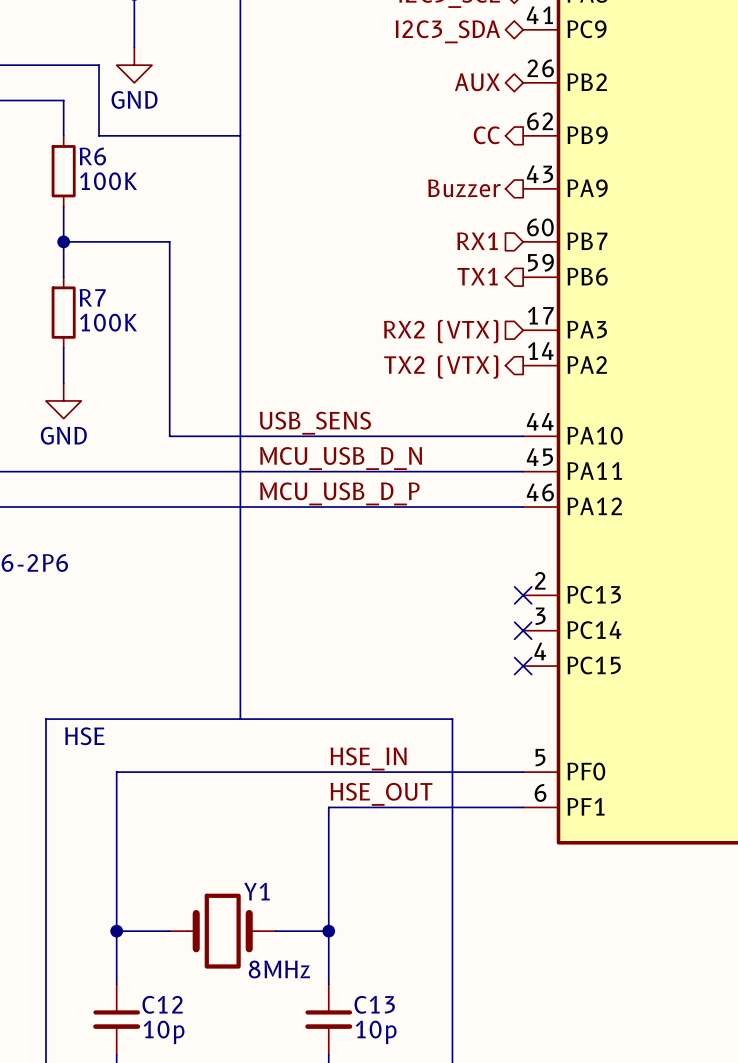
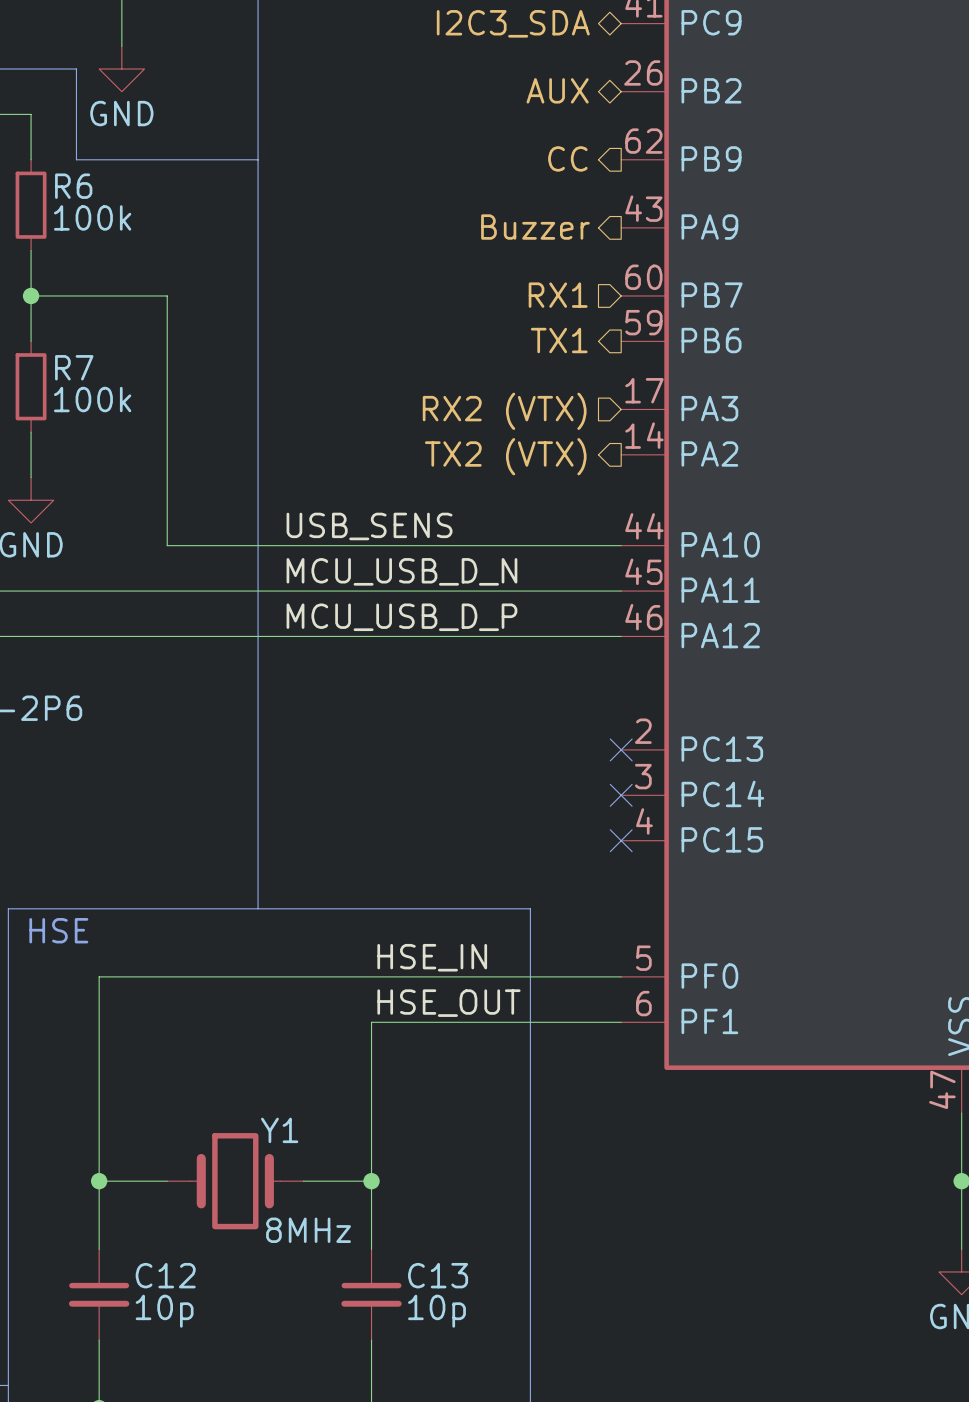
R6 value: 100K (108, 181) -> 100k (92, 217)
R7 value: 100K (108, 322) -> 100k (92, 399)

